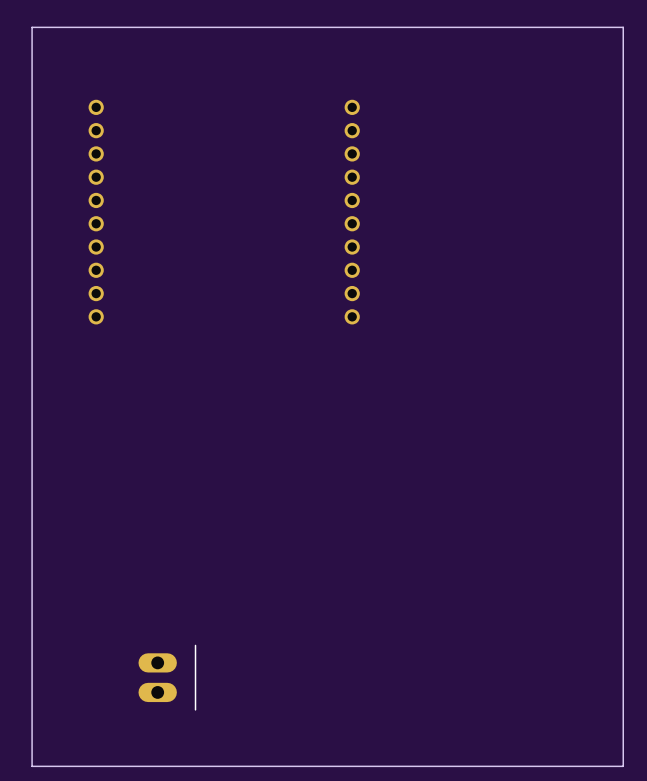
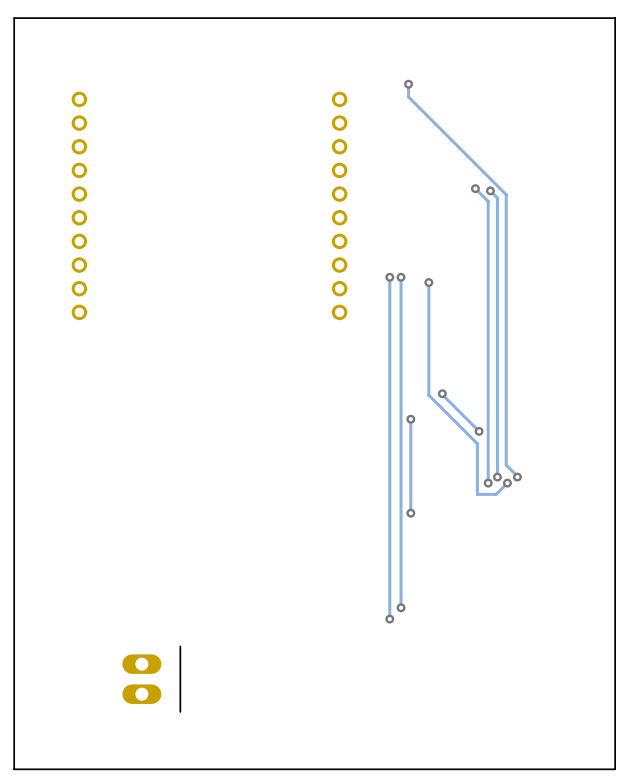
track: none -> (408, 84) (408, 96) (506, 194) (506, 465) (517, 477)
via: none -> (408, 84)
track: none -> (475, 188) (488, 201) (488, 483)
via: none -> (475, 188)
track: none -> (490, 190) (497, 197) (497, 477)
via: none -> (490, 190)
track: none -> (389, 277) (389, 619)
via: none -> (389, 277)
track: none -> (401, 277) (401, 607)
via: none -> (401, 277)
track: none -> (428, 282) (428, 395) (477, 443) (477, 494) (496, 494) (507, 483)
via: none -> (428, 282)
track: none -> (442, 393) (479, 431)
via: none -> (442, 393)
track: none -> (410, 419) (410, 513)
via: none -> (410, 419)
via: none -> (479, 431)
via: none -> (497, 477)
via: none -> (517, 477)
via: none -> (488, 483)
via: none -> (507, 483)
via: none -> (410, 513)
via: none -> (401, 607)
via: none -> (389, 619)

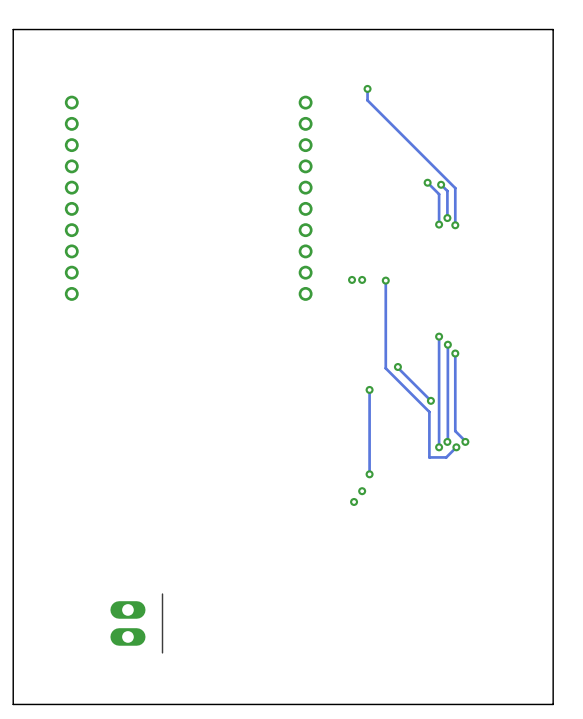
track: (497, 227) (497, 477) -> (447, 344) (447, 441)
via: none -> (447, 218)
track: (488, 235) (488, 359) -> none
via: none -> (439, 224)
track: (506, 235) (506, 378) -> none
via: none -> (455, 225)
track: (389, 277) (389, 619) -> none
via: (389, 277) -> none
track: (401, 277) (401, 607) -> none
via: (401, 277) -> none
track: (428, 282) (428, 297) -> none
via: (428, 282) -> none
via: none -> (352, 279)
via: none -> (362, 279)
via: none -> (385, 280)
via: none -> (439, 336)
via: none -> (447, 344)
via: none -> (455, 353)
via: none -> (362, 491)
via: none -> (354, 501)
via: (401, 607) -> none
via: (389, 619) -> none

